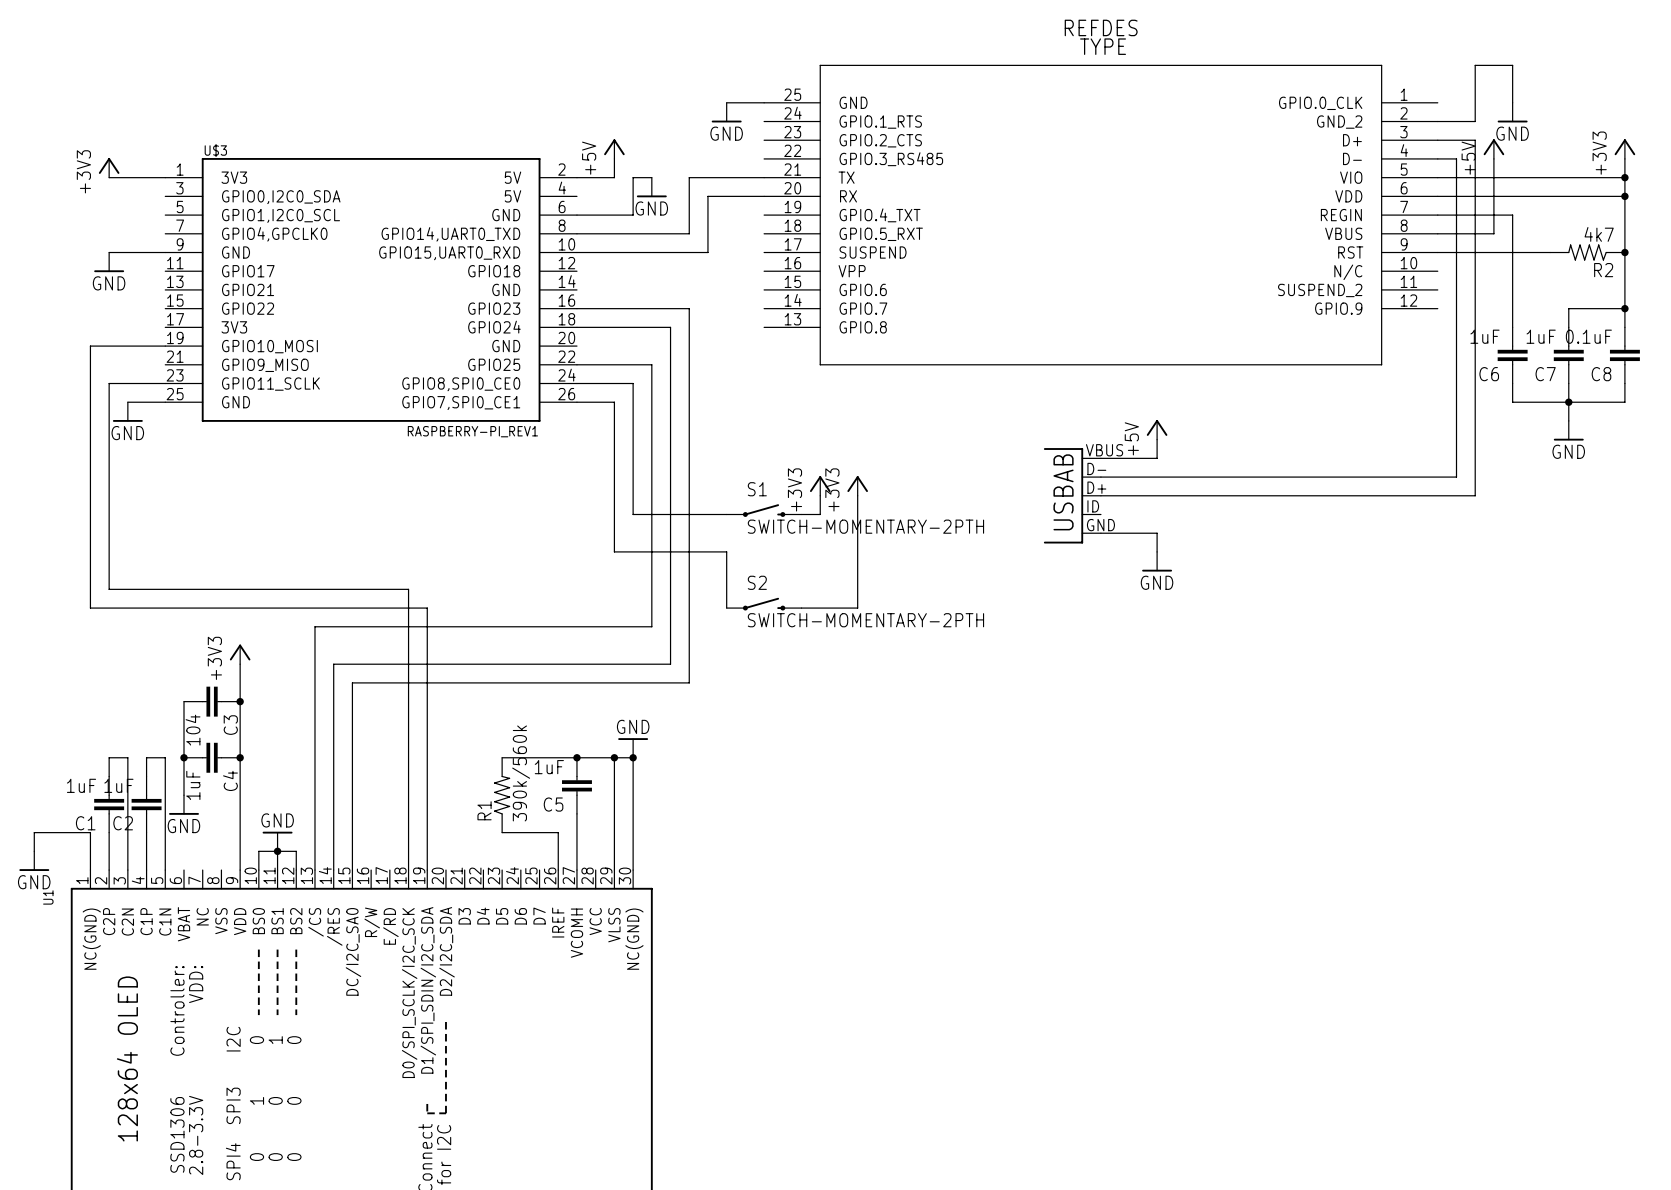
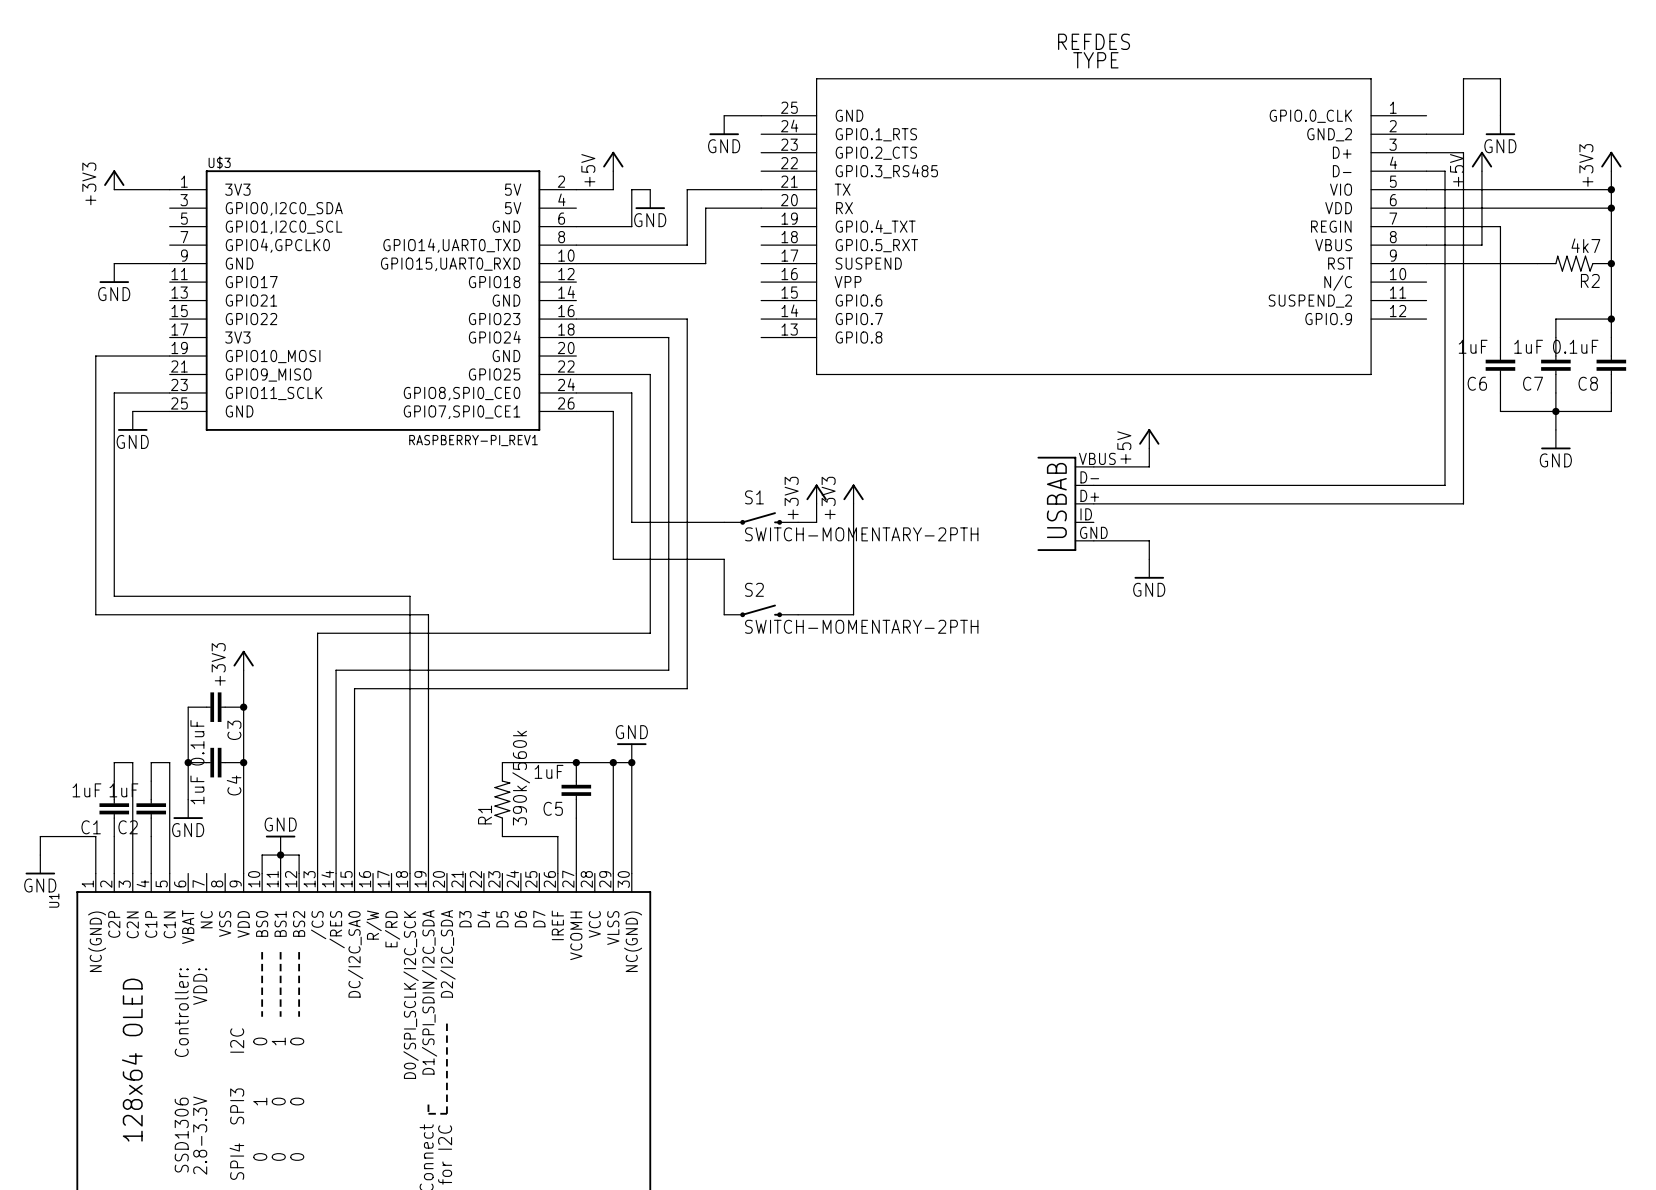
C3 value: 104 (193, 730) -> 0.1uF (197, 742)

